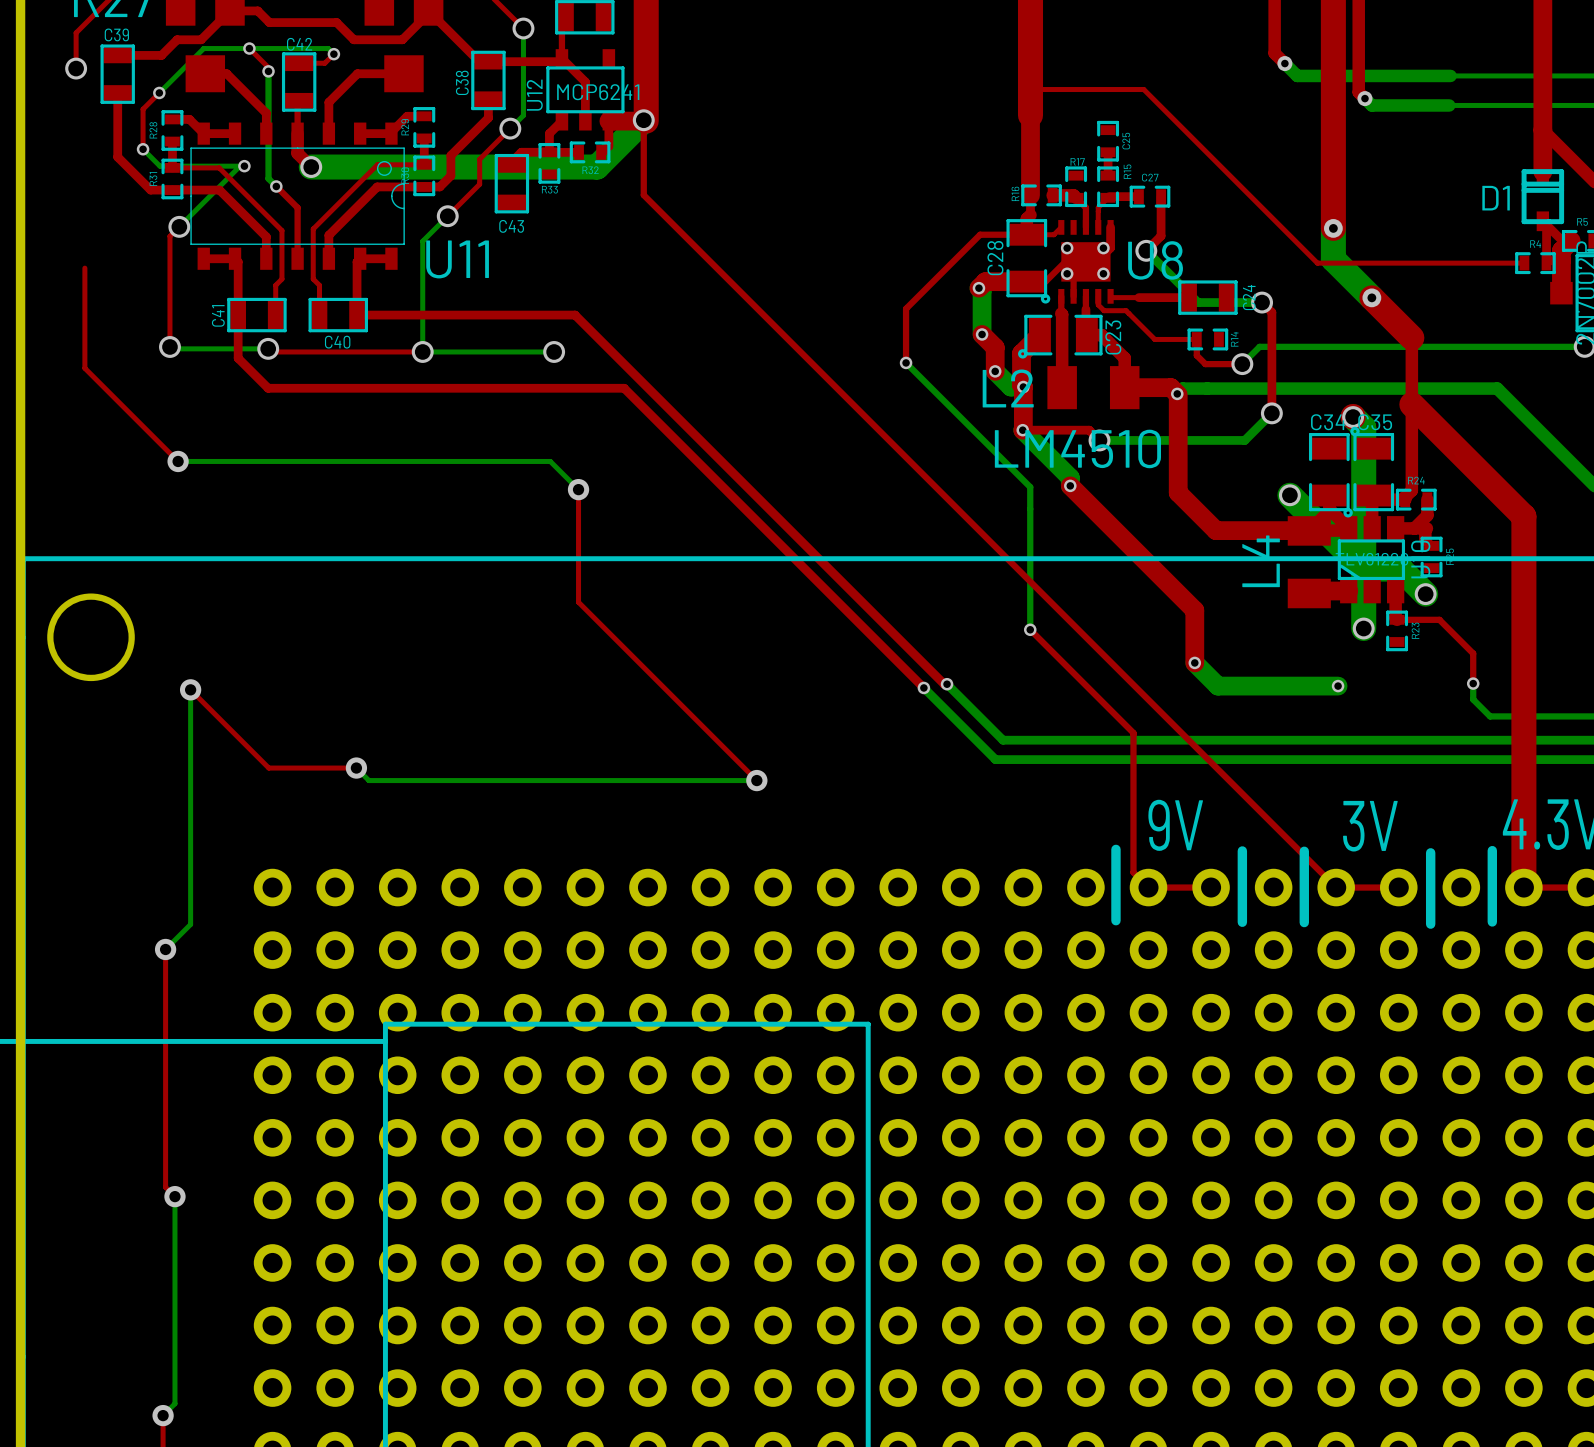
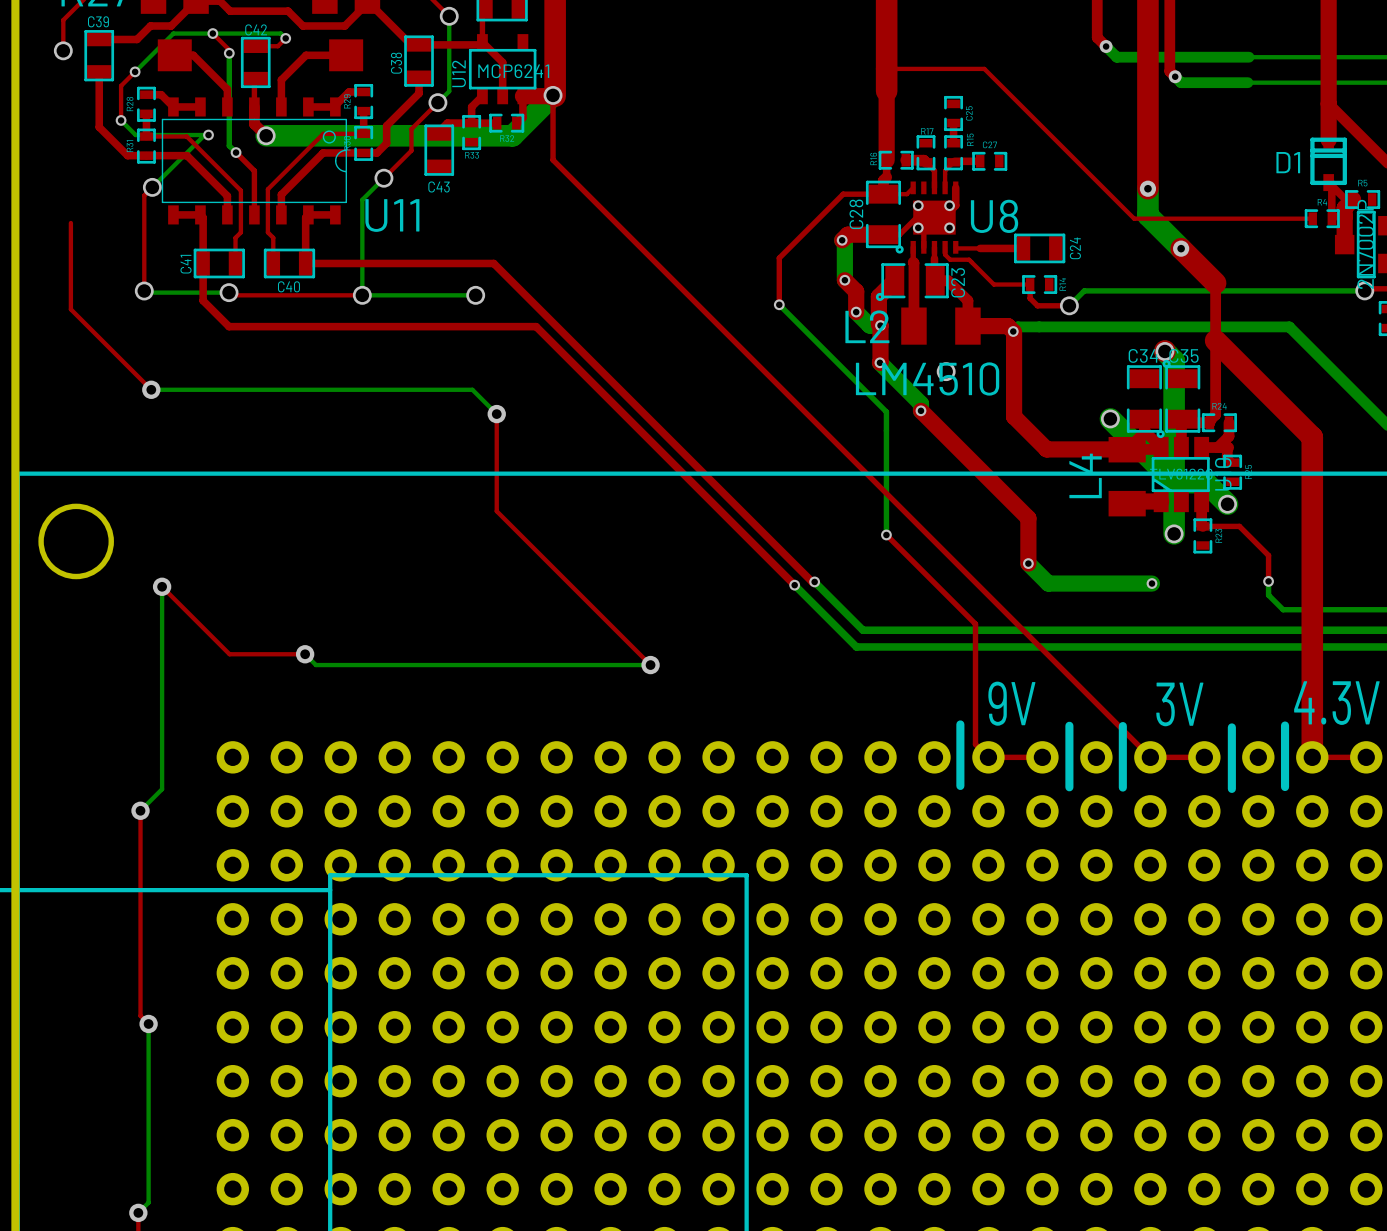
top track: (1161, 196) (1161, 236) (1146, 250) -> none
bottom track: (1146, 250) (1198, 302) (1262, 302) -> none
via: (1146, 250) -> none
top track: (1262, 302) (1271, 312) (1271, 413) -> none
via: (1262, 302) -> none
bottom track: (1271, 413) (1244, 440) (1099, 440) -> none
via: (1271, 413) -> none
top track: (1022, 430) (1089, 430) (1099, 440) -> none

